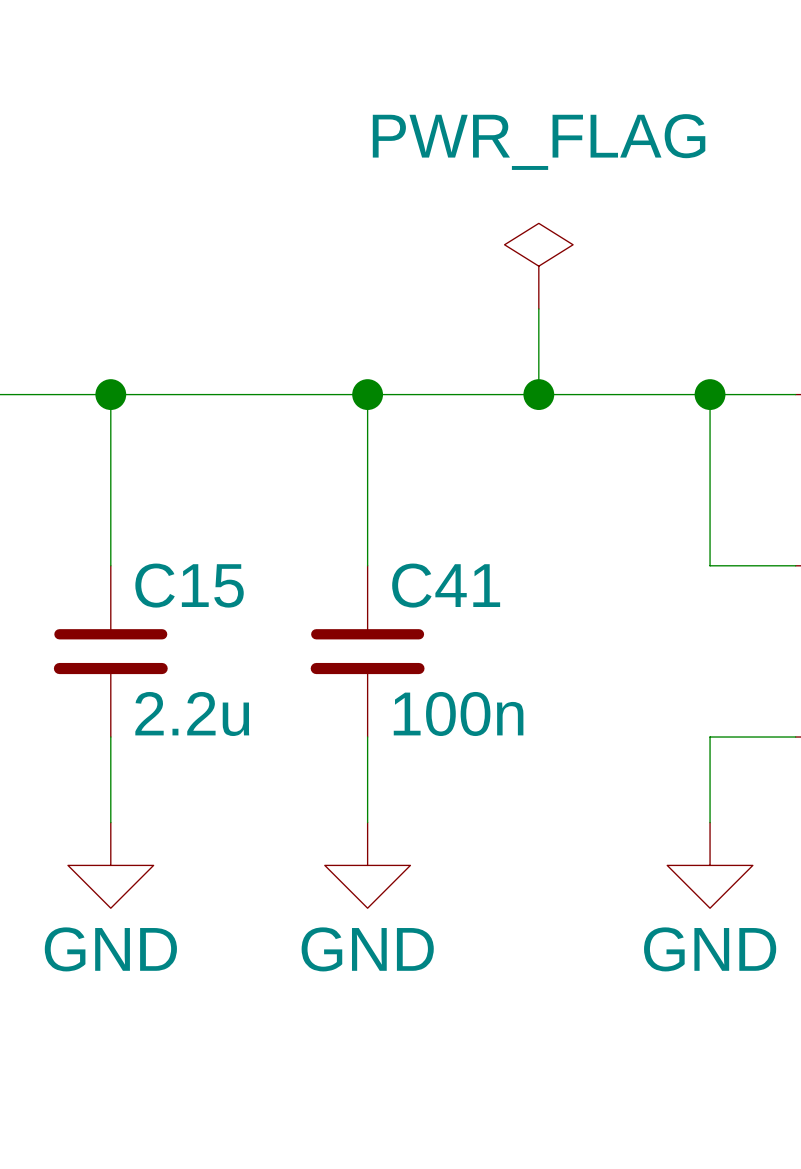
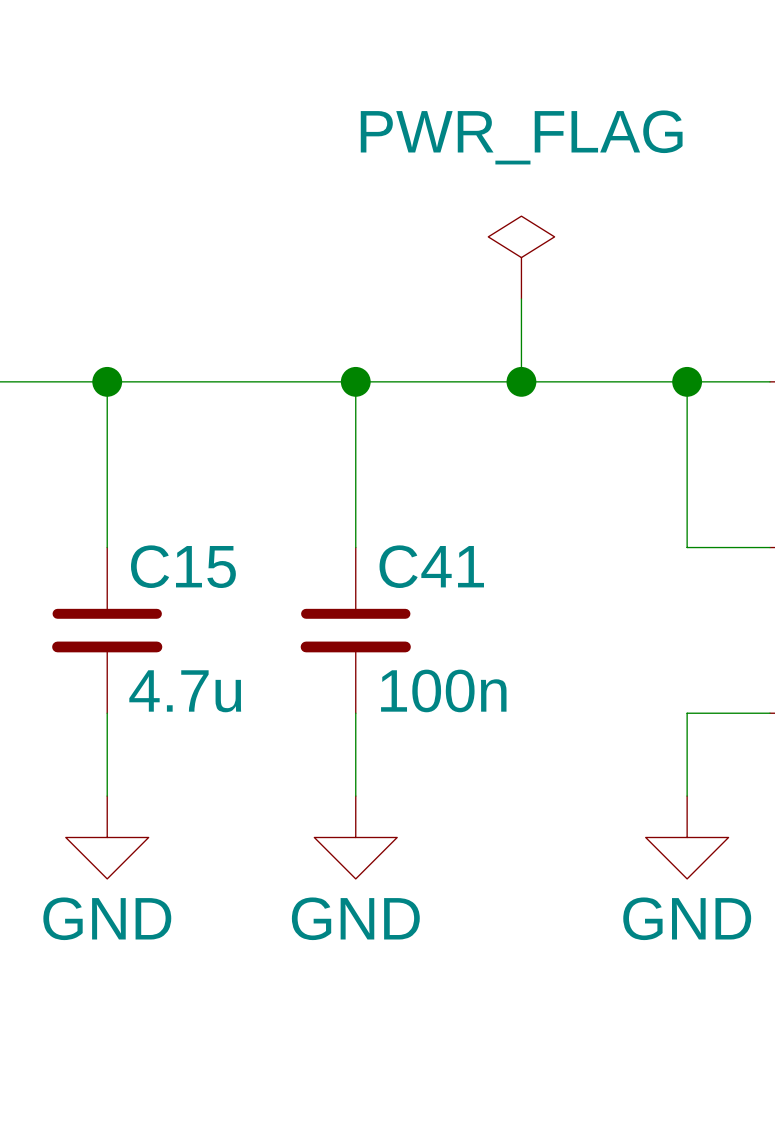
C15 value: 2.2u (192, 713) -> 4.7u (185, 691)

